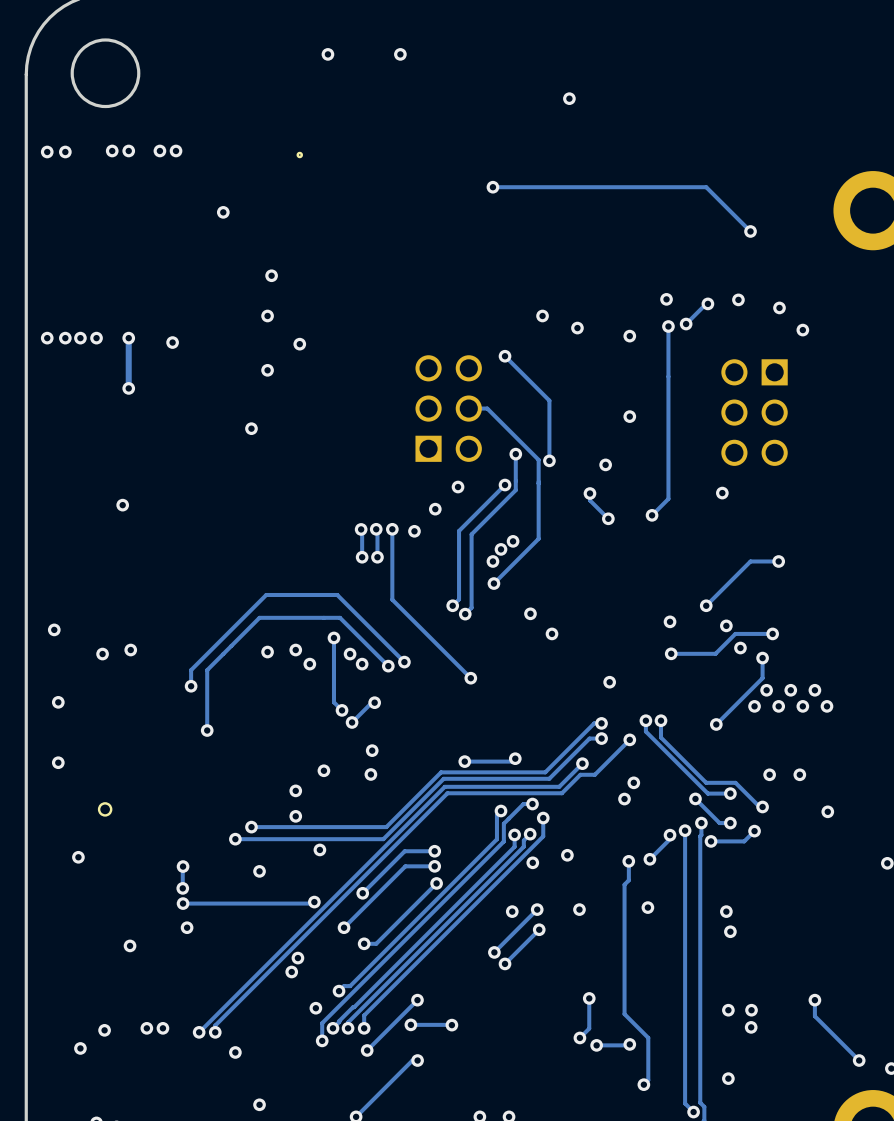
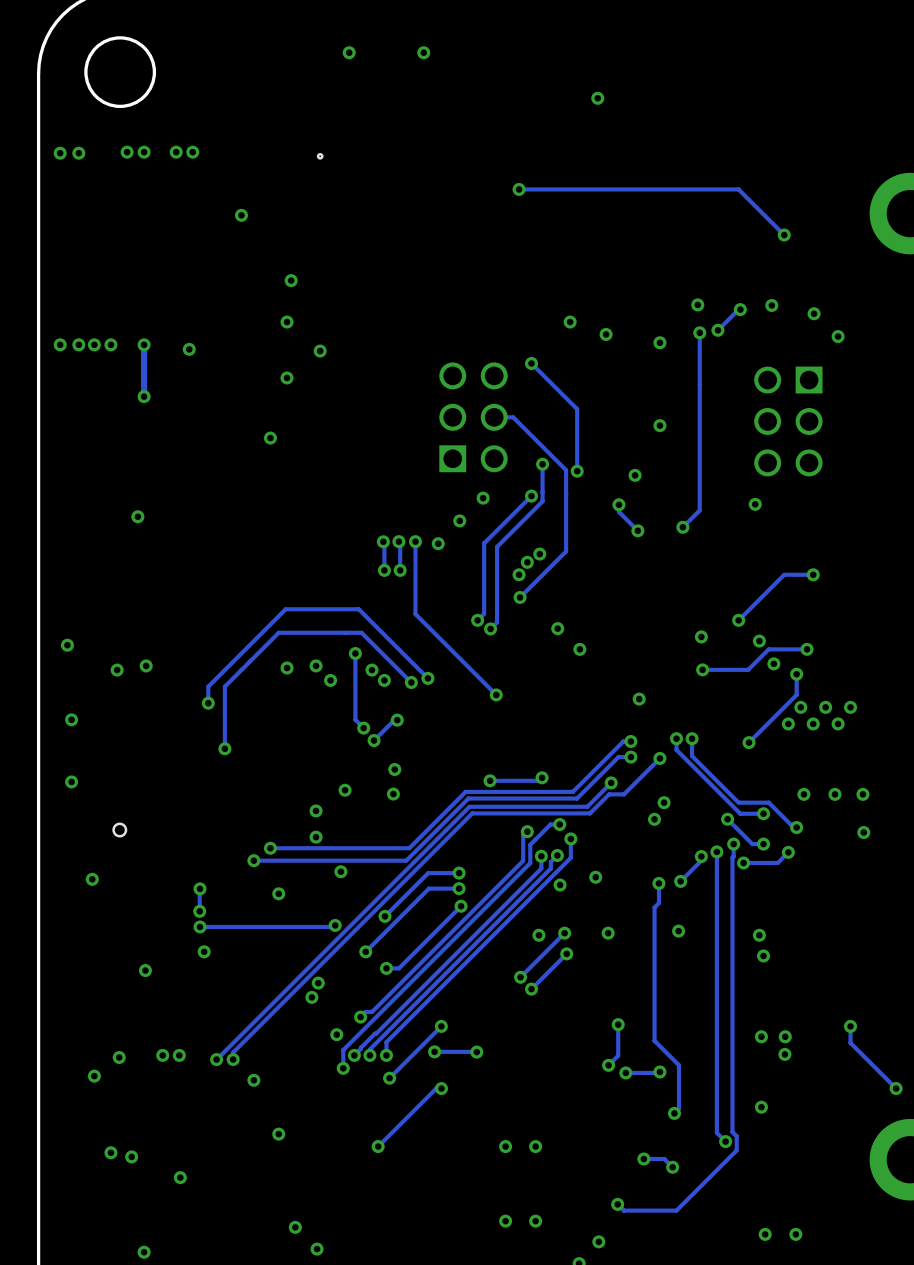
via: (826, 706) -> none
via: none -> (862, 794)

